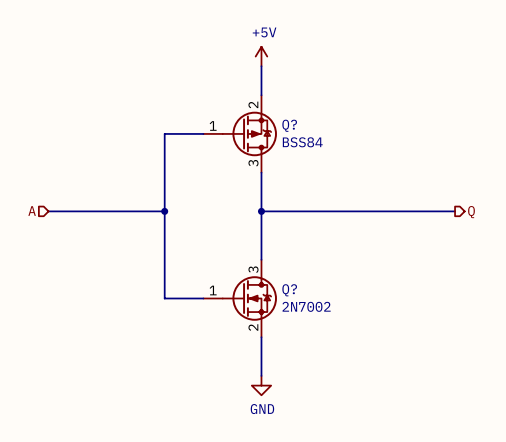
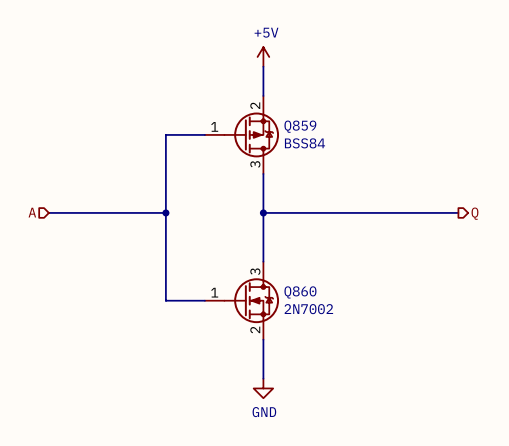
Q? name: Q? (289, 125) -> Q859 (300, 126)
Q? name: Q? (289, 290) -> Q860 (300, 292)

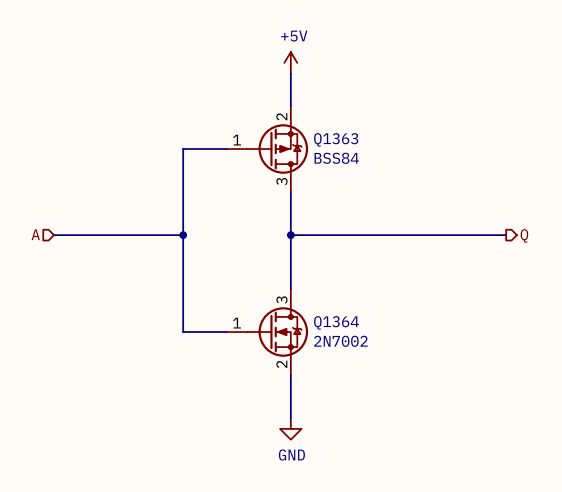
Q859 name: Q859 (300, 126) -> Q1363 (336, 139)
Q860 name: Q860 (300, 292) -> Q1364 (336, 322)

